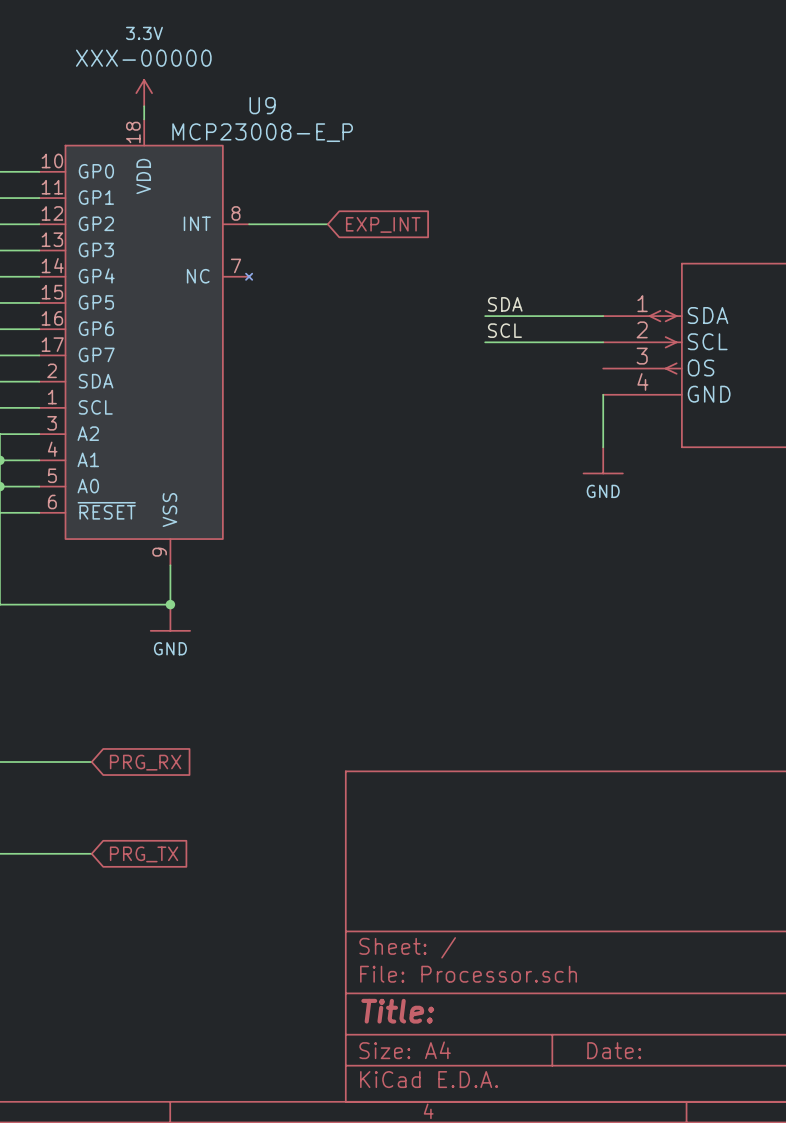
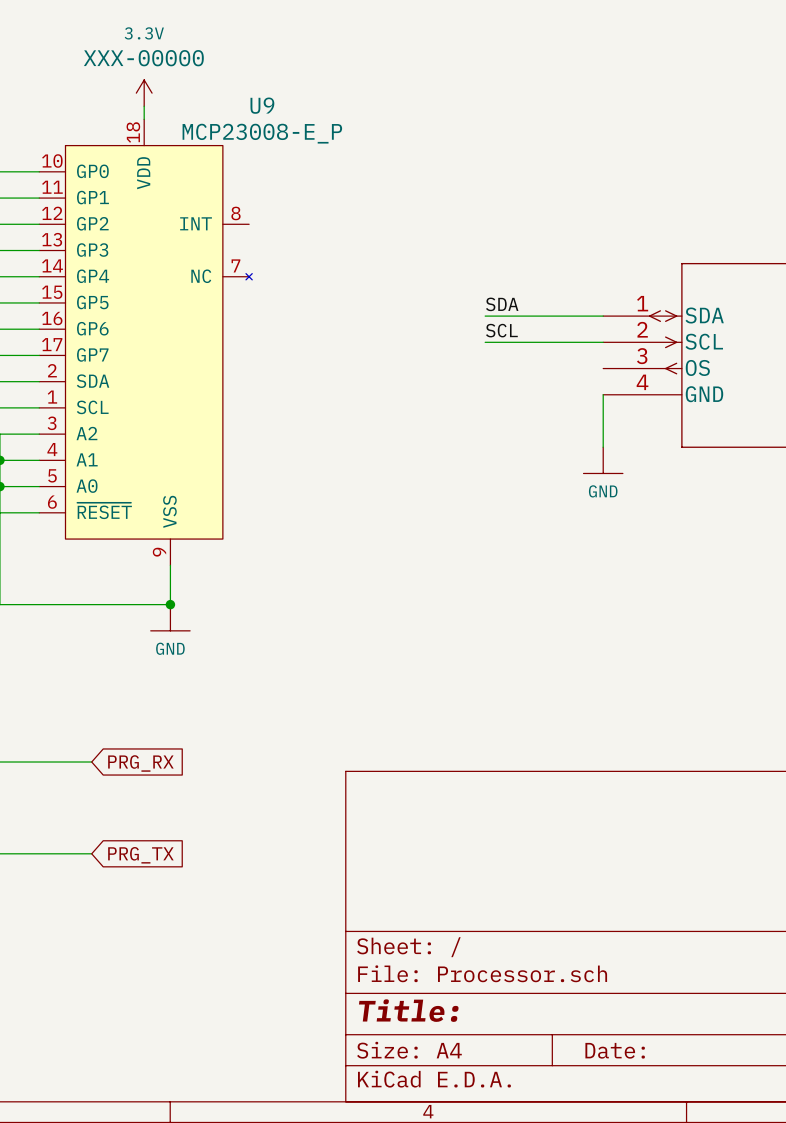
wire: (249, 224) (327, 224) -> none
global label: EXP_INT (383, 224) -> none

